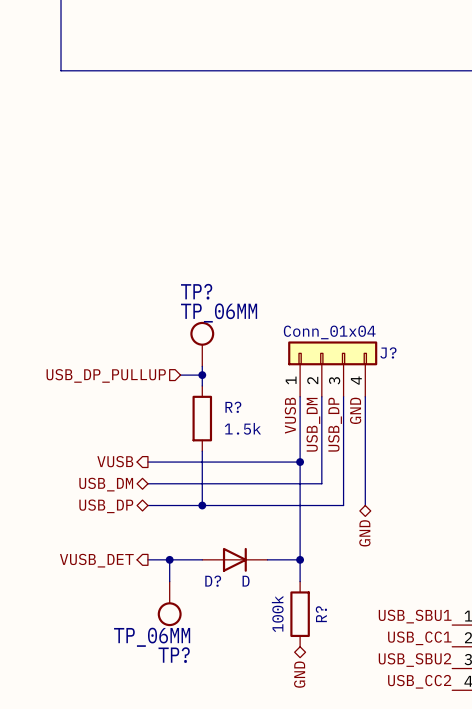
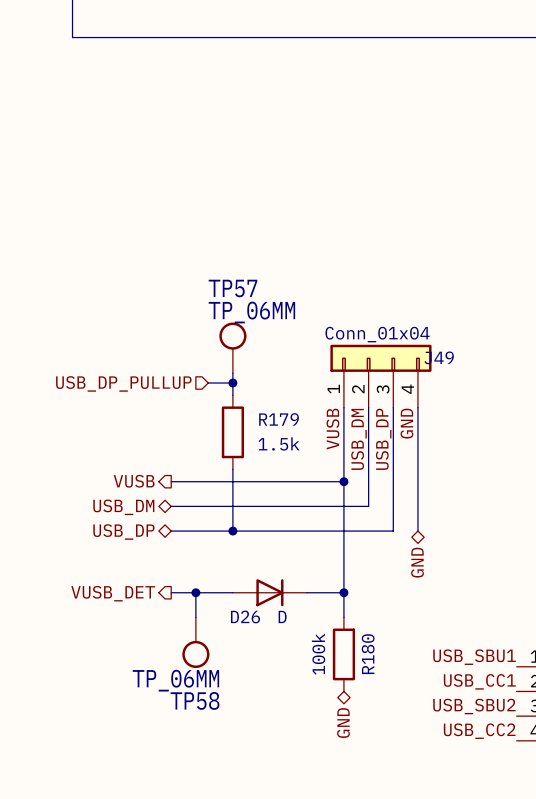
TP? name: TP? (196, 291) -> TP57 (233, 288)
J? name: J? (388, 352) -> J49 (439, 357)
R? name: R? (233, 407) -> R179 (279, 419)
D? name: D? (213, 581) -> D26 (245, 616)
R? name: R? (321, 614) -> R180 (368, 654)
TP? name: TP? (174, 655) -> TP58 (195, 700)

